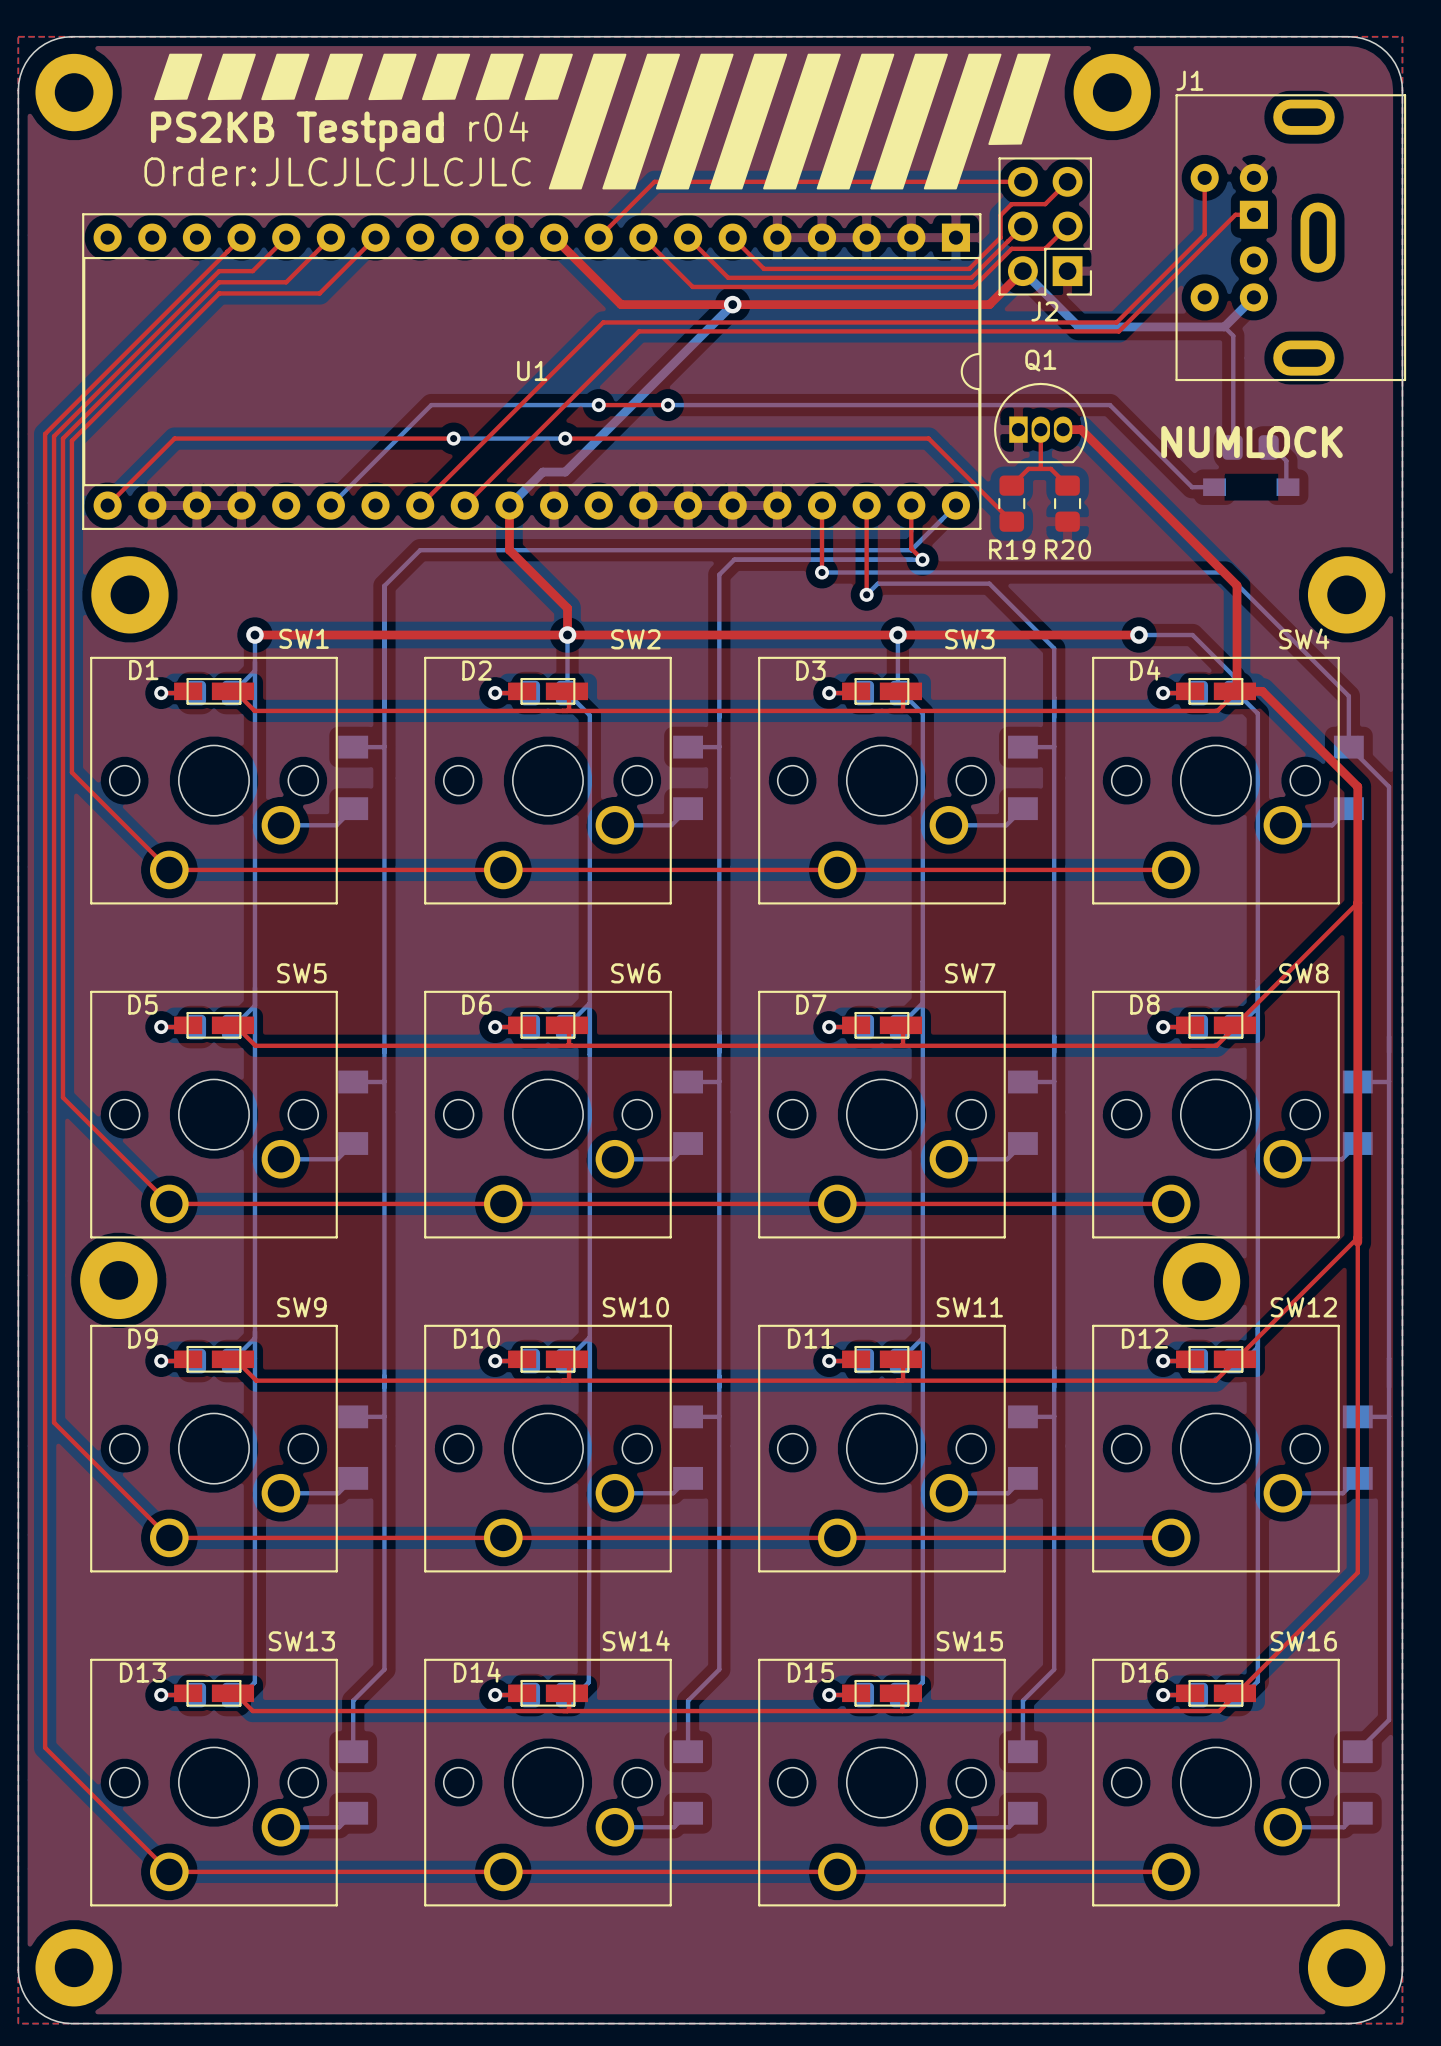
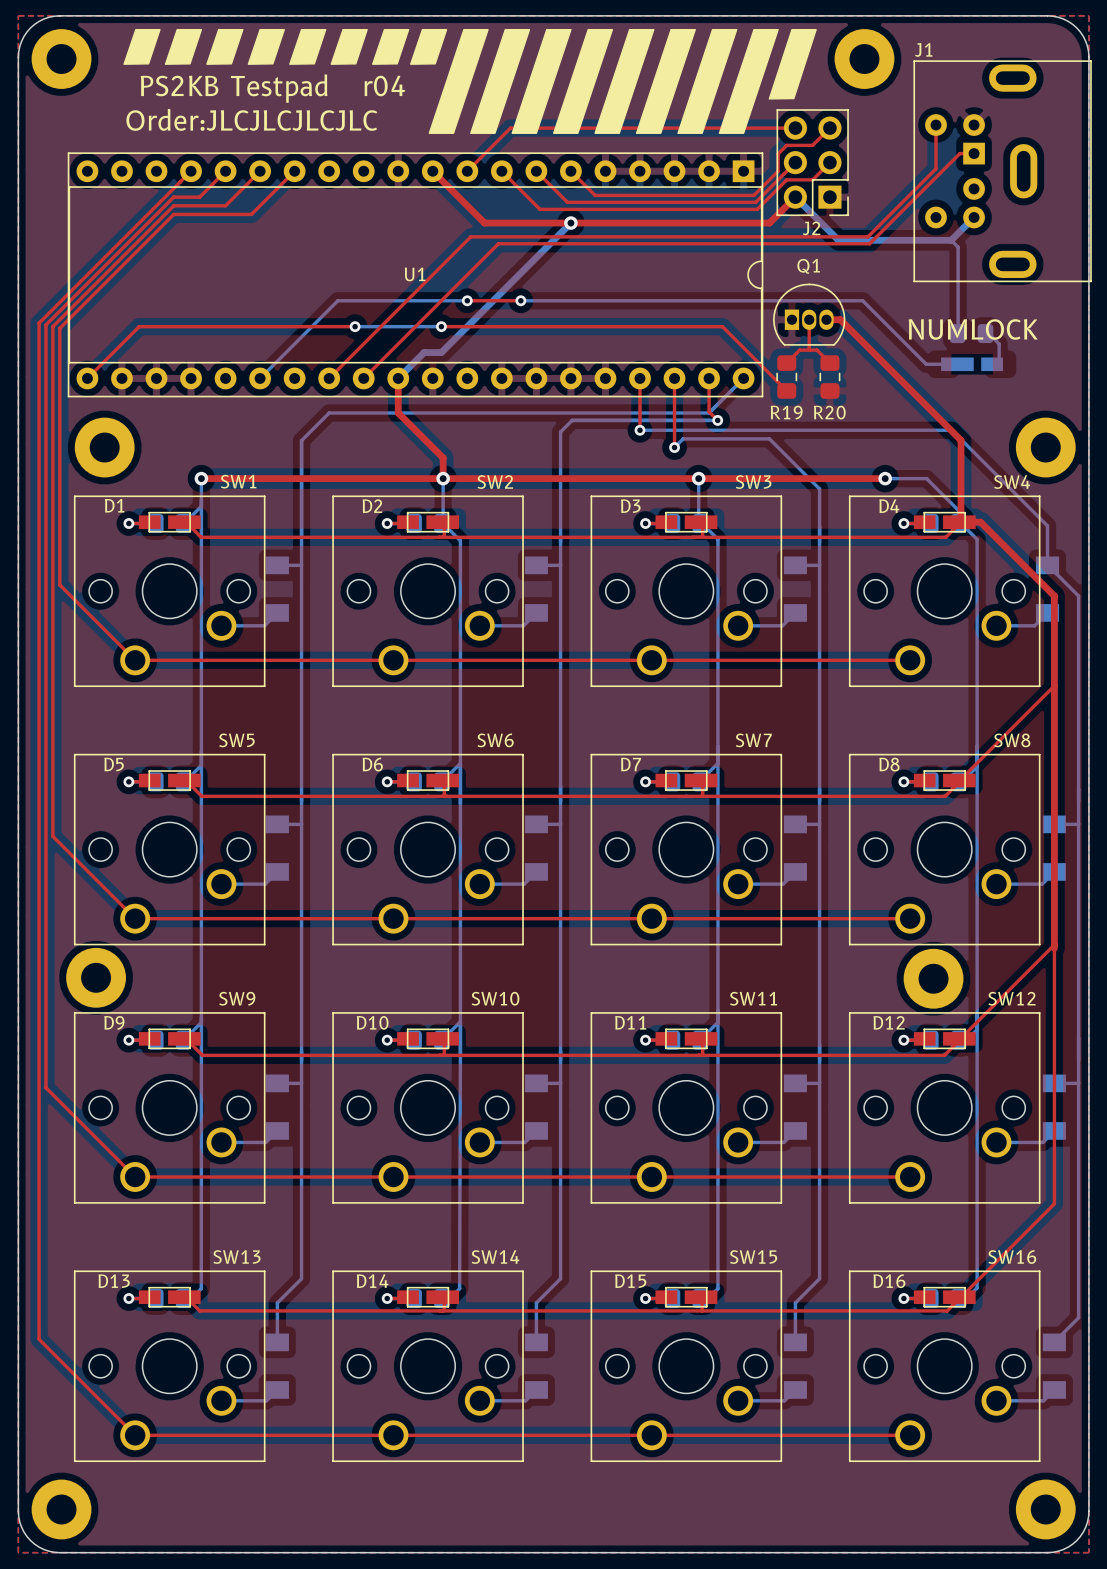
part footprint: [1203, 478, 1300, 496] -> [941, 357, 1003, 372]

